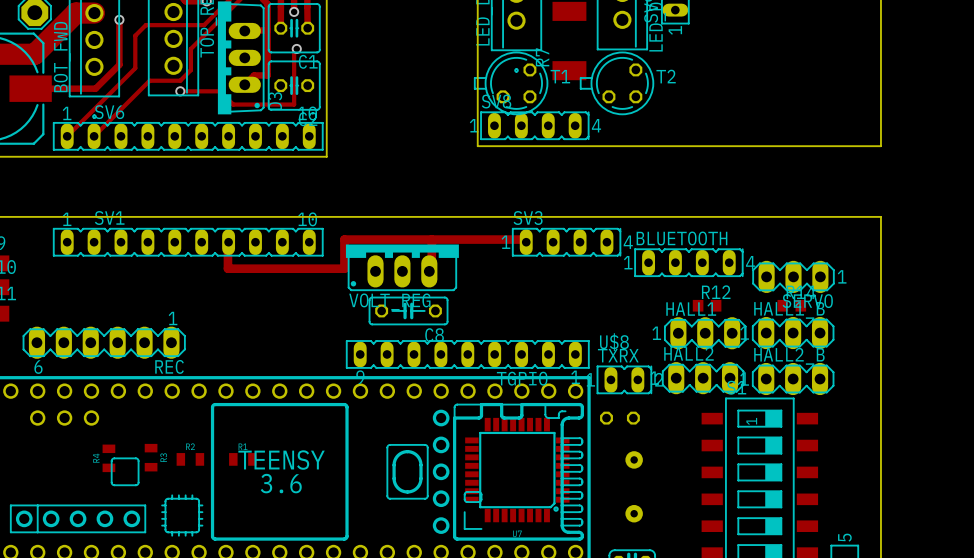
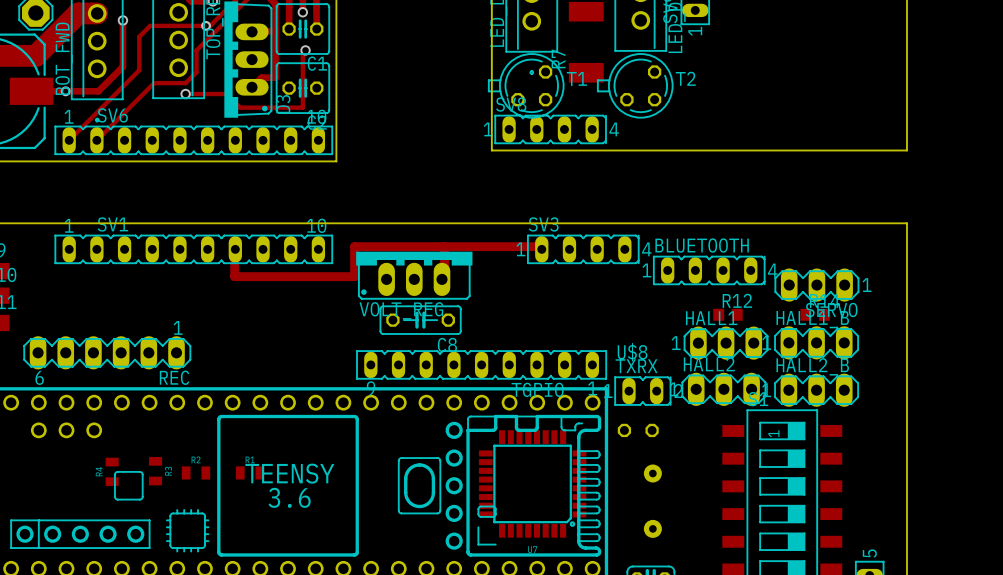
via: none -> (206, 25)
via: none -> (65, 91)

